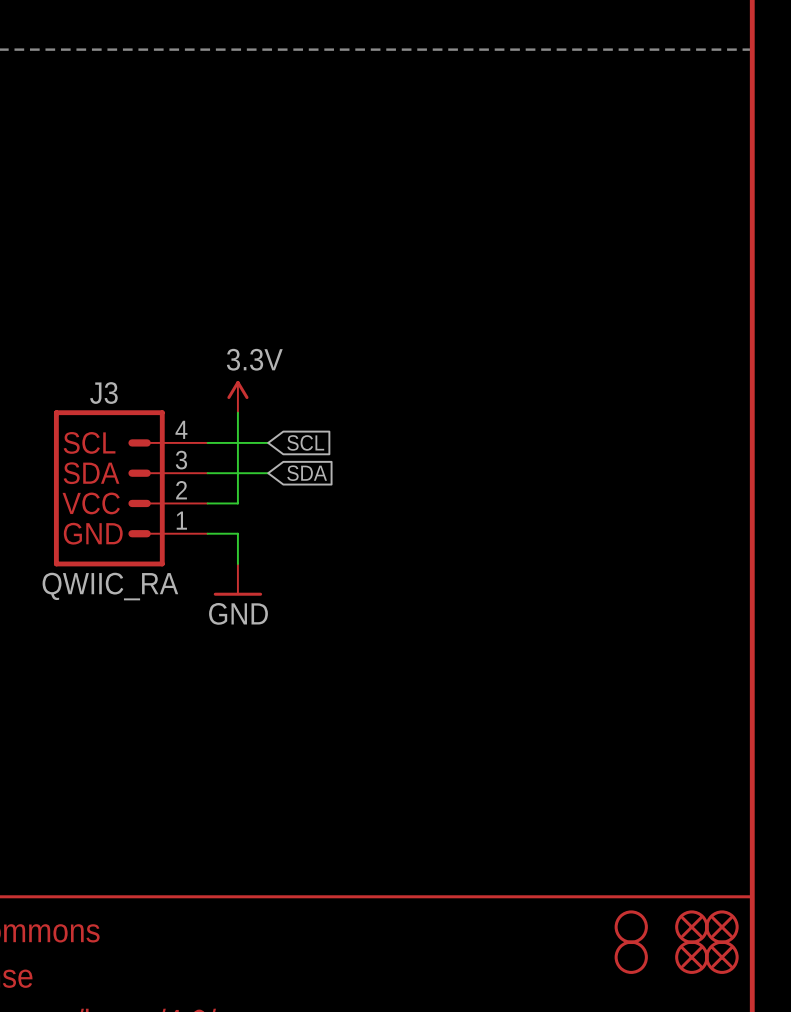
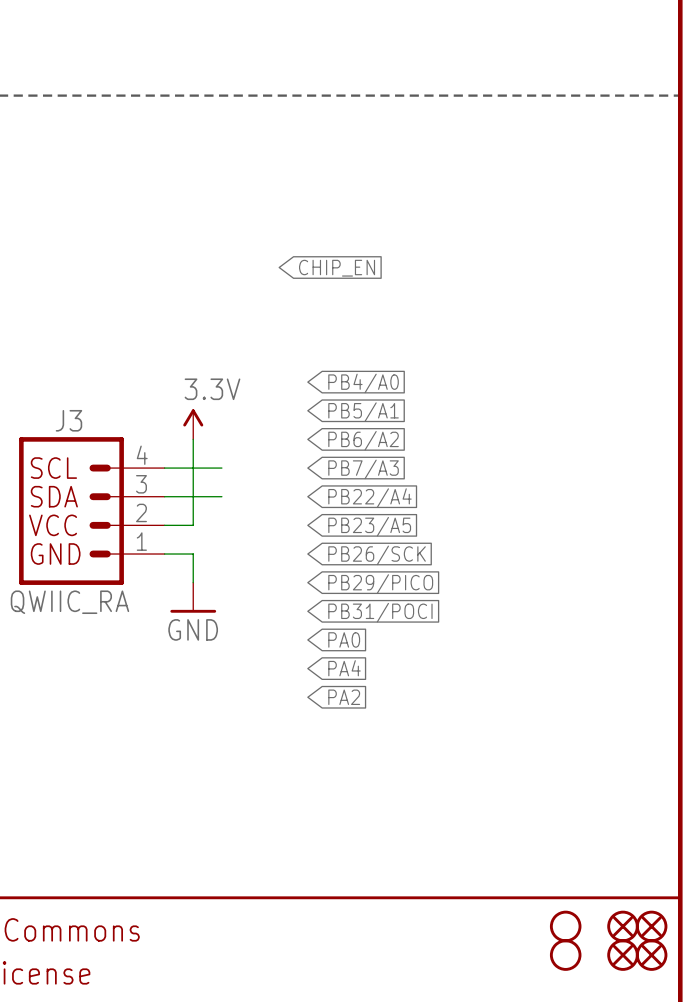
global label: none -> CHIP_EN (337, 268)
global label: none -> PB4/A0 (363, 383)
global label: none -> PB5/A1 (363, 412)
global label: none -> PB6/A2 (363, 440)
global label: SCL (305, 442) -> none
global label: none -> PB7/A3 (363, 469)
global label: none -> PB22/A4 (369, 498)
global label: SDA (307, 473) -> none
global label: none -> PB23/A5 (369, 526)
global label: none -> PB26/SCK (377, 555)
global label: none -> PB29/PICO (380, 584)
global label: none -> PB31/POCI (380, 612)
global label: none -> PA0 (344, 639)
global label: none -> PA4 (344, 668)
global label: none -> PA2 (344, 697)

